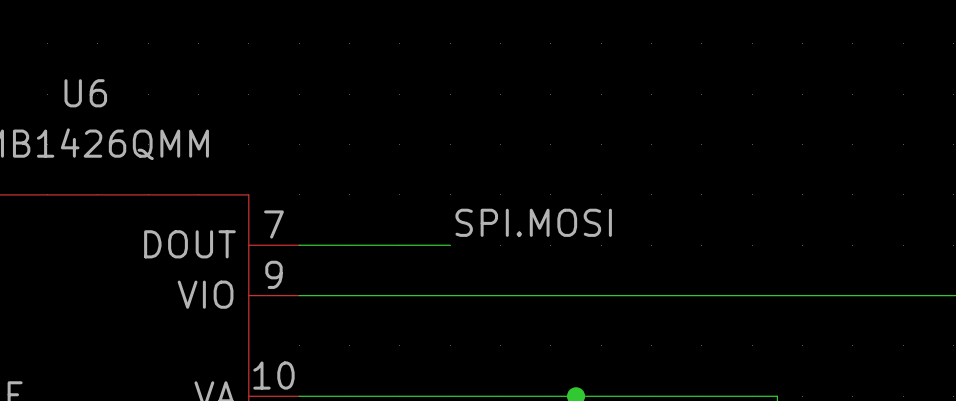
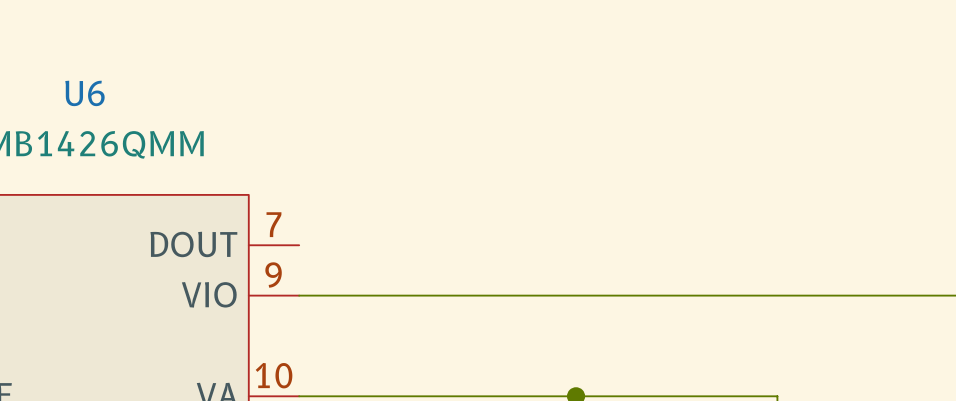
label: SPI.MOSI (533, 222) -> none
wire: (299, 245) (450, 245) -> none

